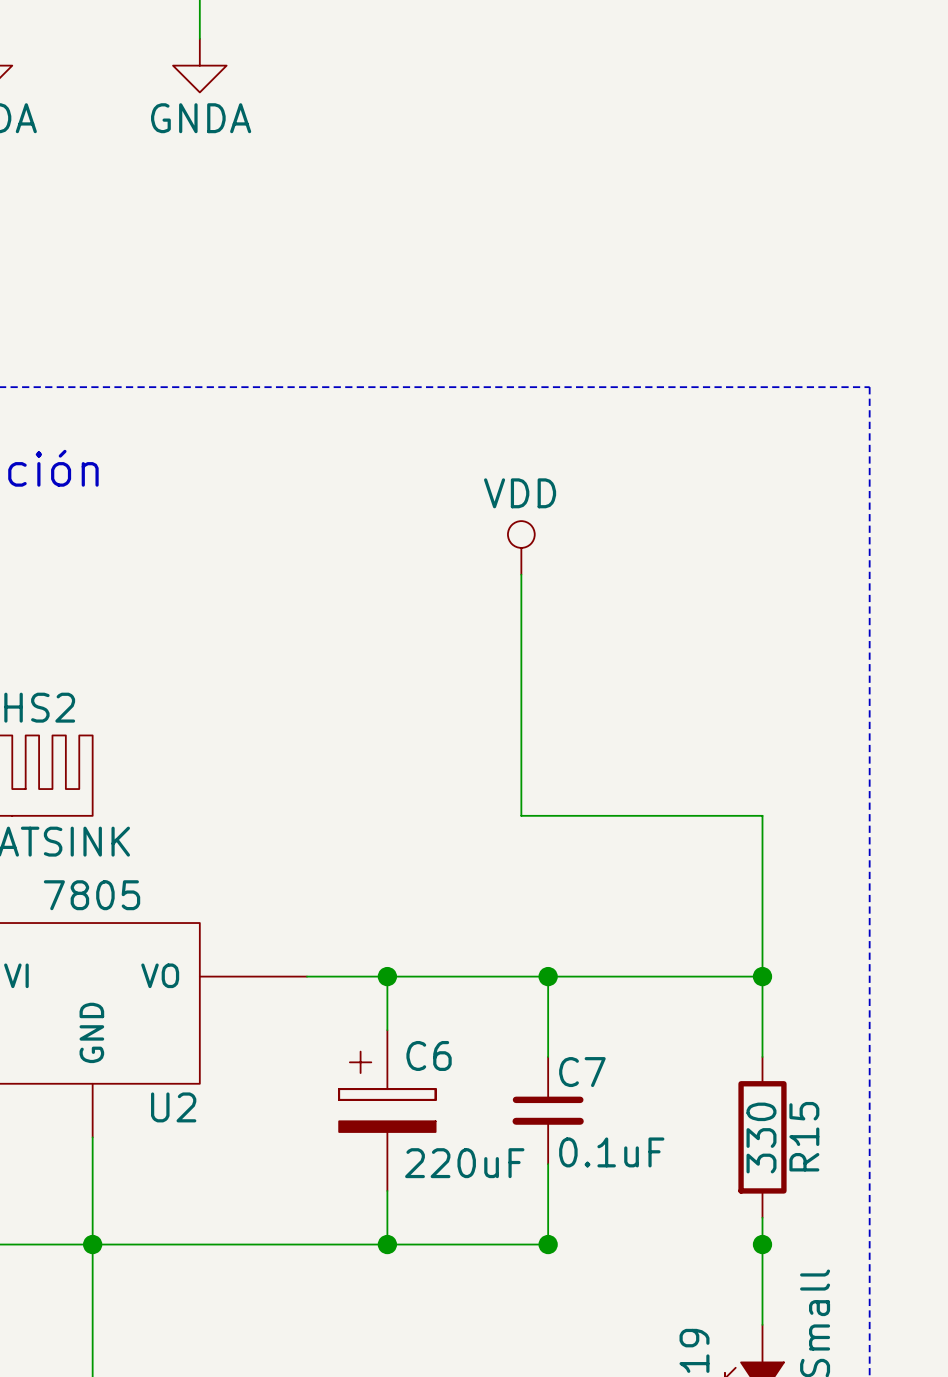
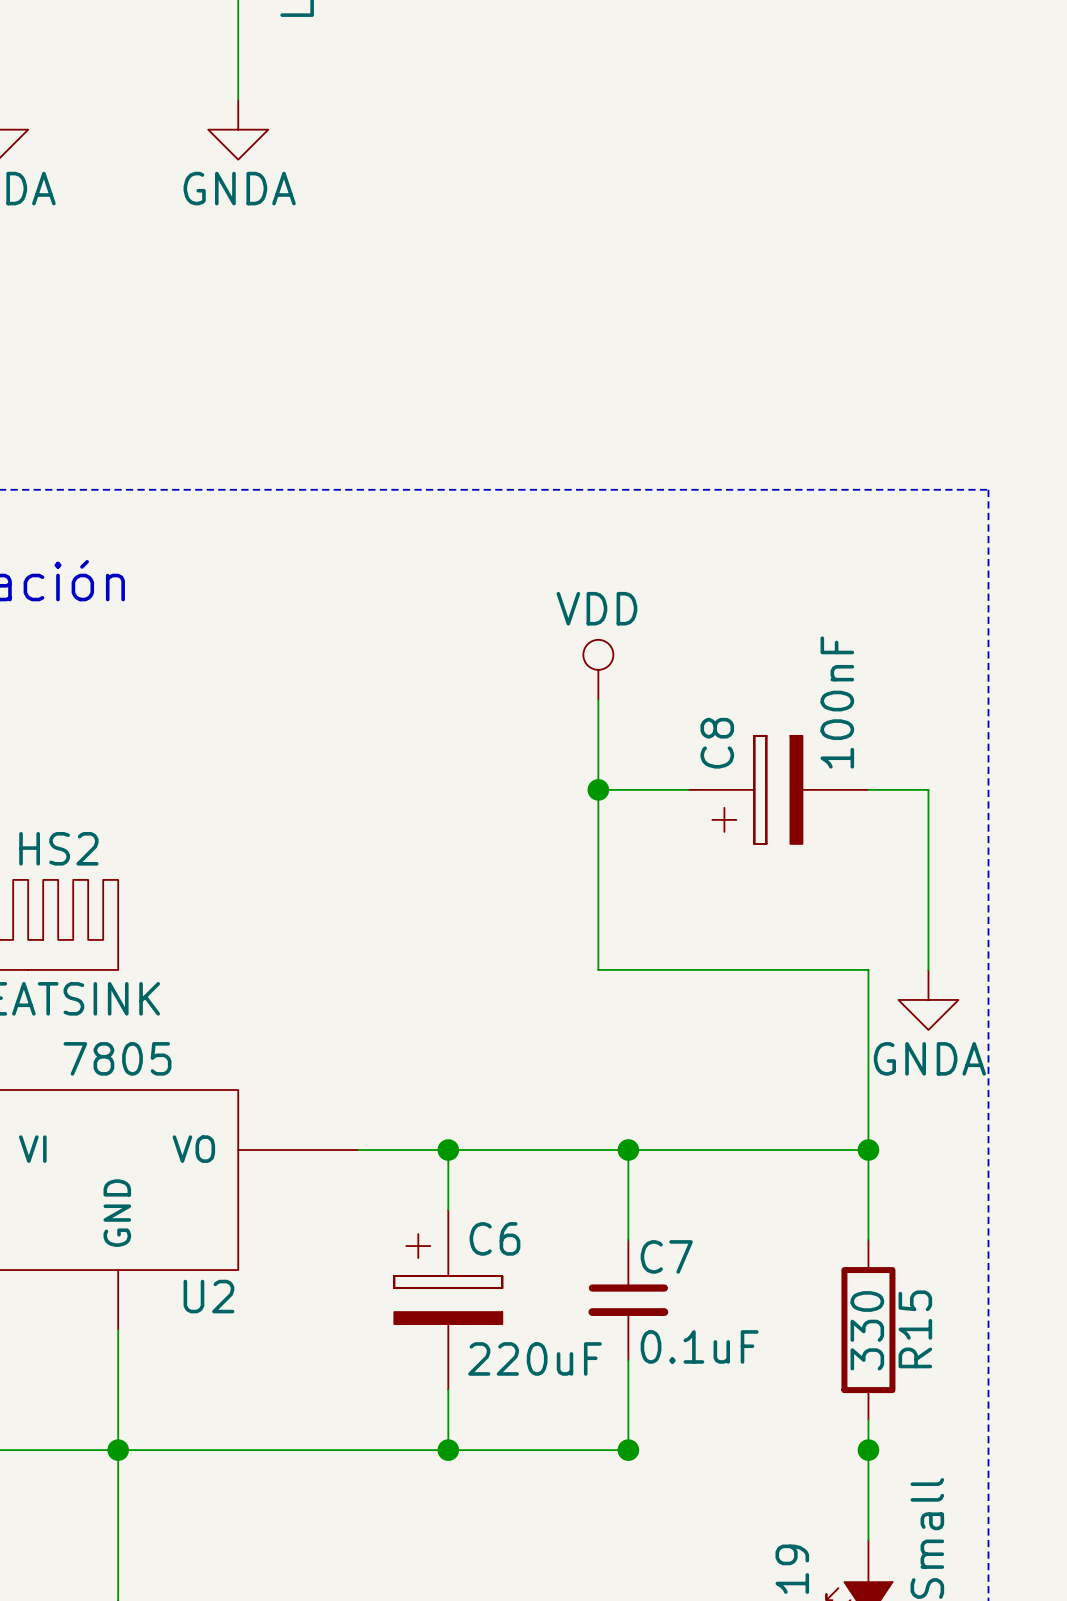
wire: none -> (598, 789) (688, 789)
junction: none -> (598, 789)
C8: none -> 100nF (778, 789)
wire: none -> (868, 789) (928, 789) (928, 969)
power symbol: none -> GNDA (928, 999)

